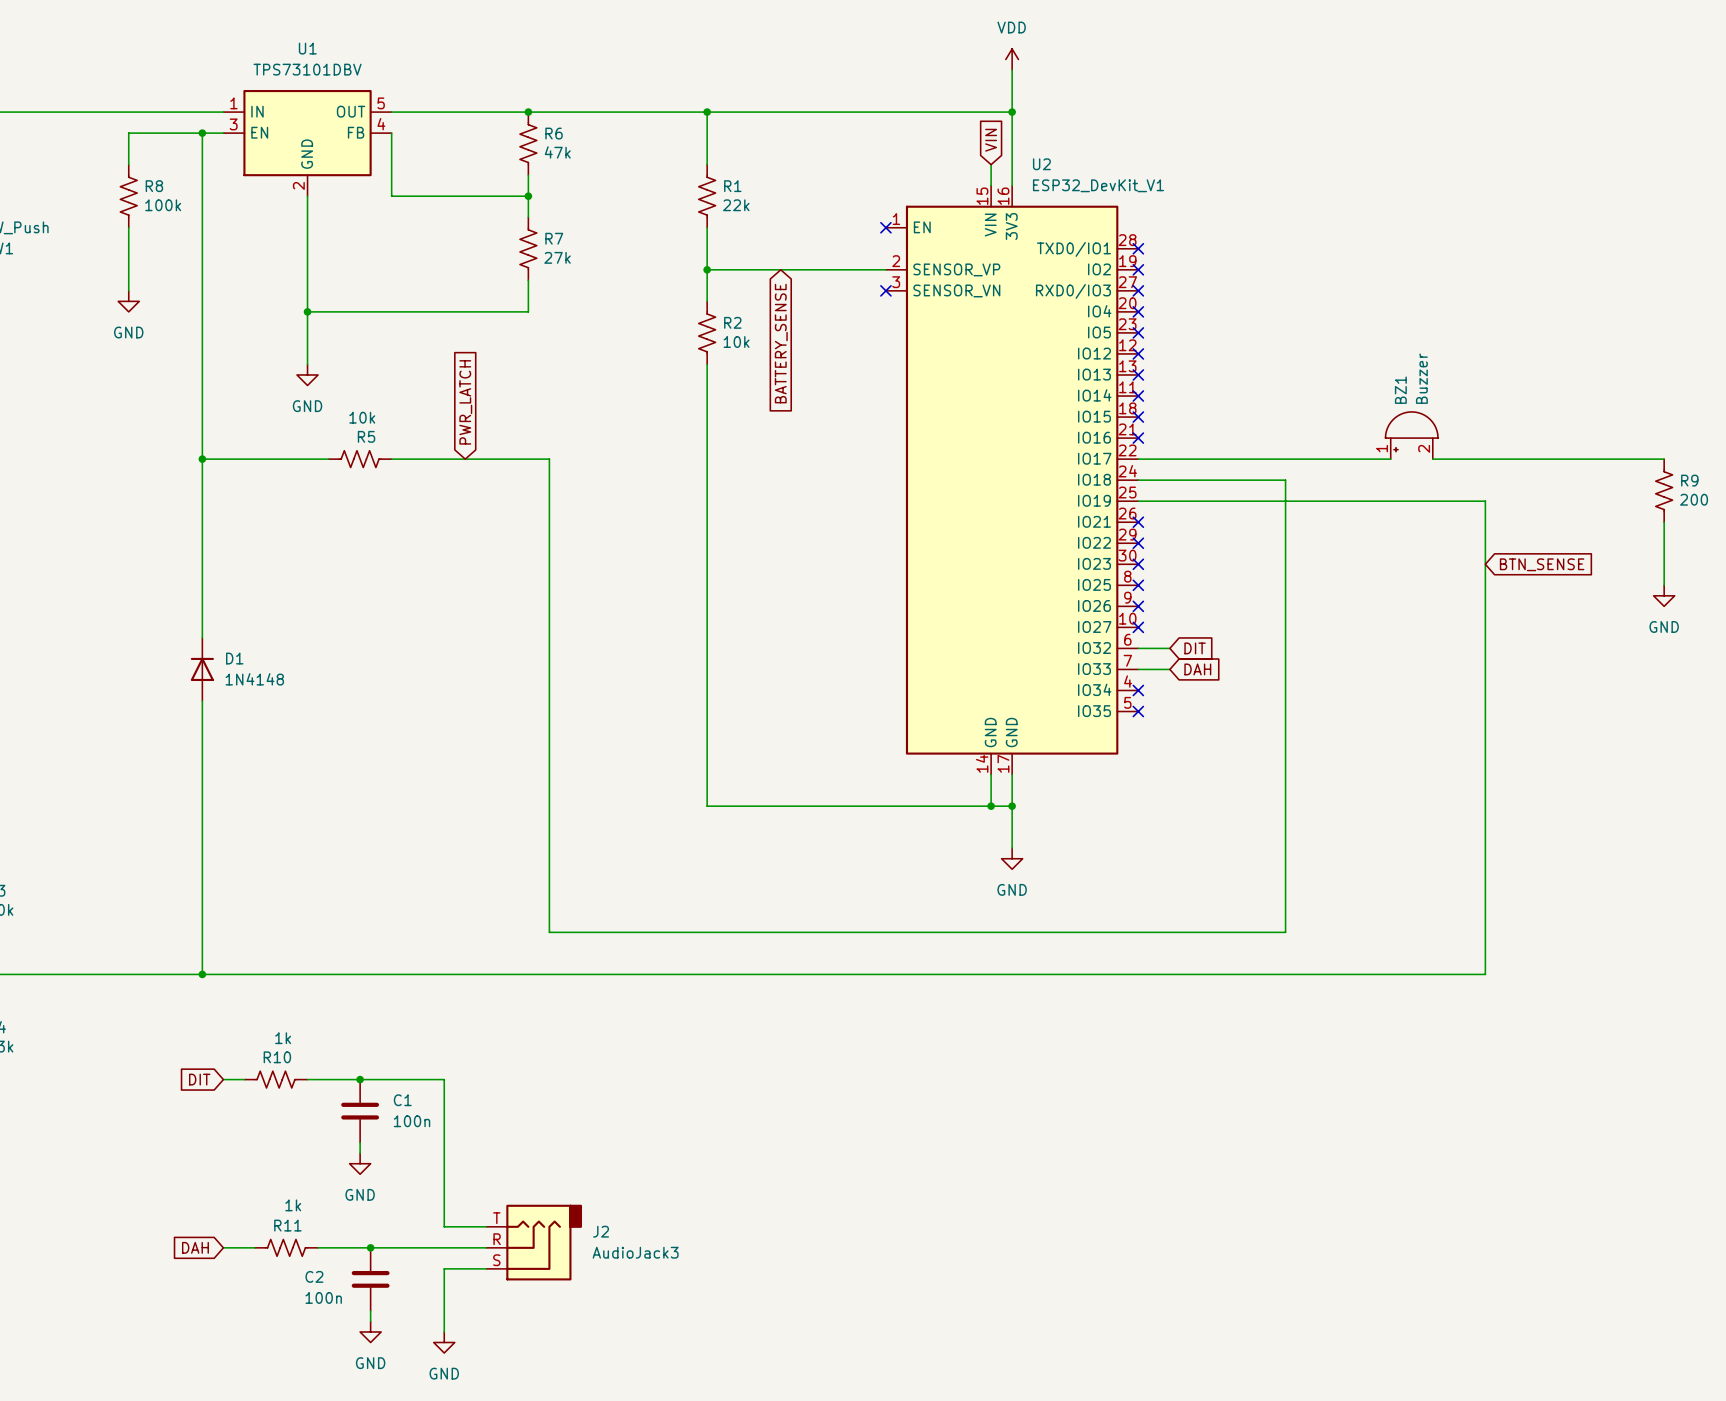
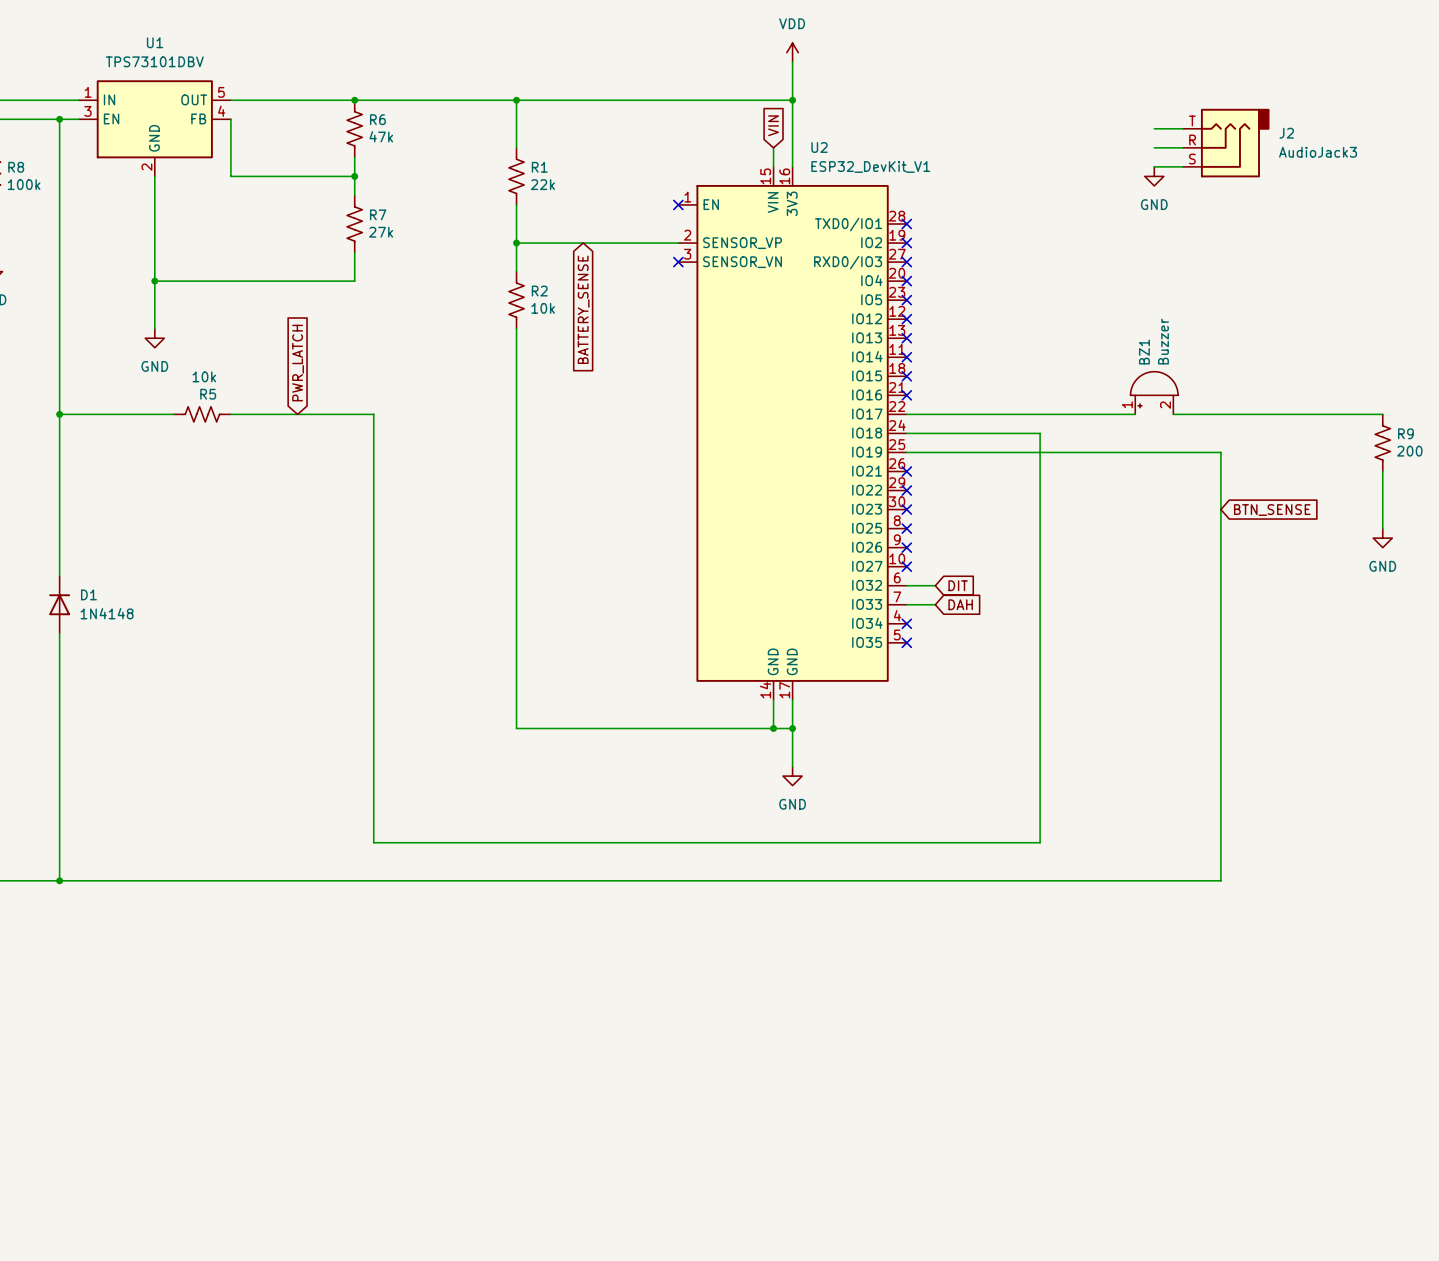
wire: none -> (1154, 128) (1182, 128)
wire: none -> (1154, 147) (1182, 147)
wire: none -> (1154, 166) (1182, 166)
power symbol: none -> GND (1154, 176)
global label: DIT (199, 1079) -> none
wire: (223, 1079) (244, 1079) -> none
R10: 1k (275, 1079) -> none
wire: (307, 1079) (444, 1079) (444, 1226) (486, 1226) -> none
junction: (360, 1079) -> none
C1: 100n (360, 1111) -> none
wire: (360, 1142) (360, 1153) -> none
power symbol: GND (360, 1163) -> none
J2 position: (534, 1242) -> (1226, 143)
global label: DAH (195, 1247) -> none
wire: (223, 1247) (254, 1247) -> none
R11: 1k (286, 1247) -> none
wire: (318, 1247) (486, 1247) -> none
junction: (370, 1247) -> none
wire: (486, 1268) (444, 1268) (444, 1331) -> none
C2: 100n (370, 1279) -> none
wire: (370, 1310) (370, 1321) -> none
power symbol: GND (370, 1331) -> none
power symbol: GND (444, 1342) -> none

